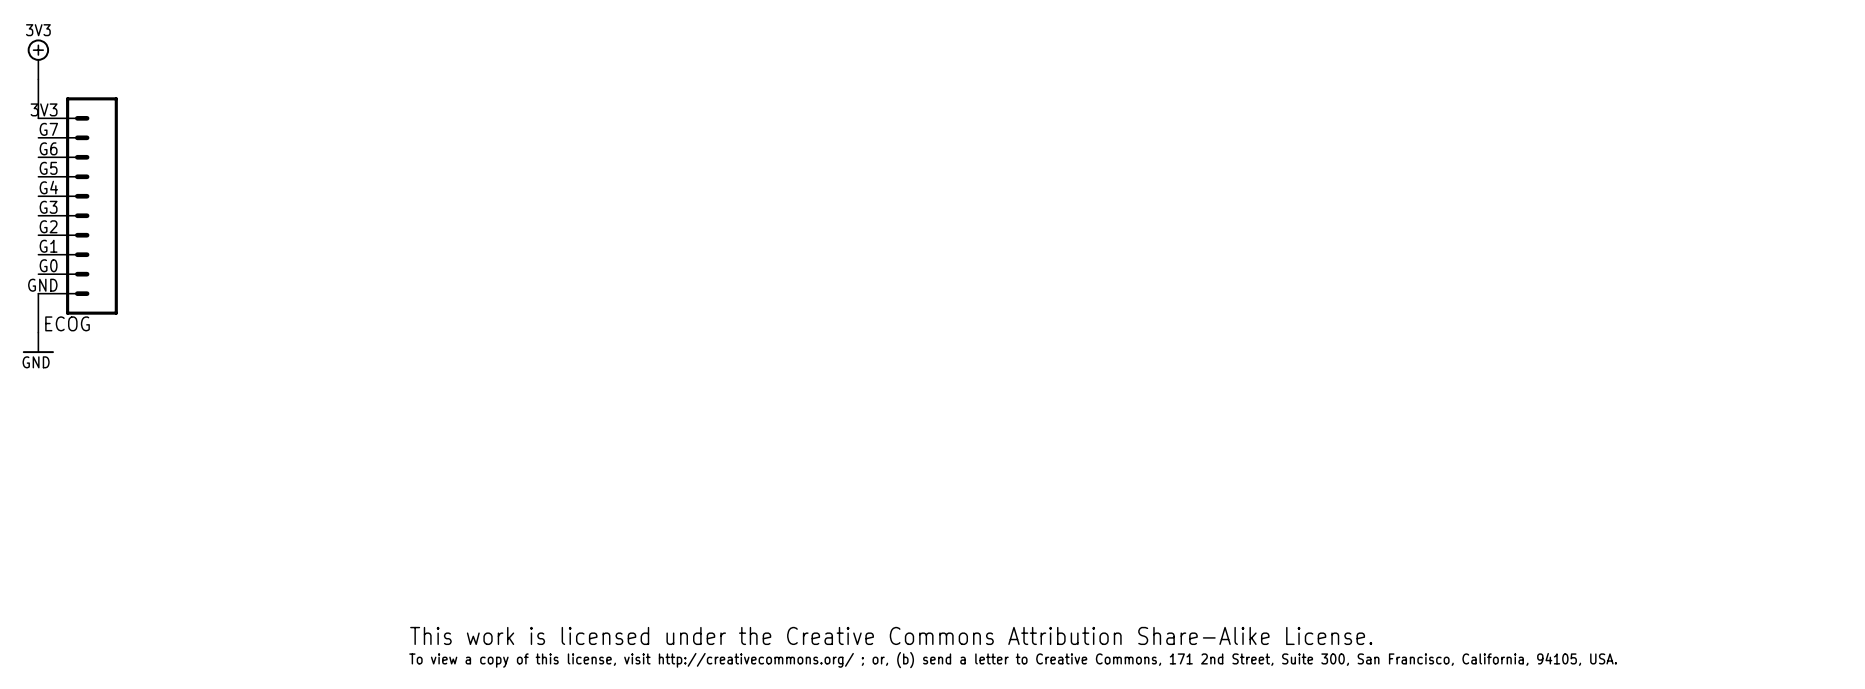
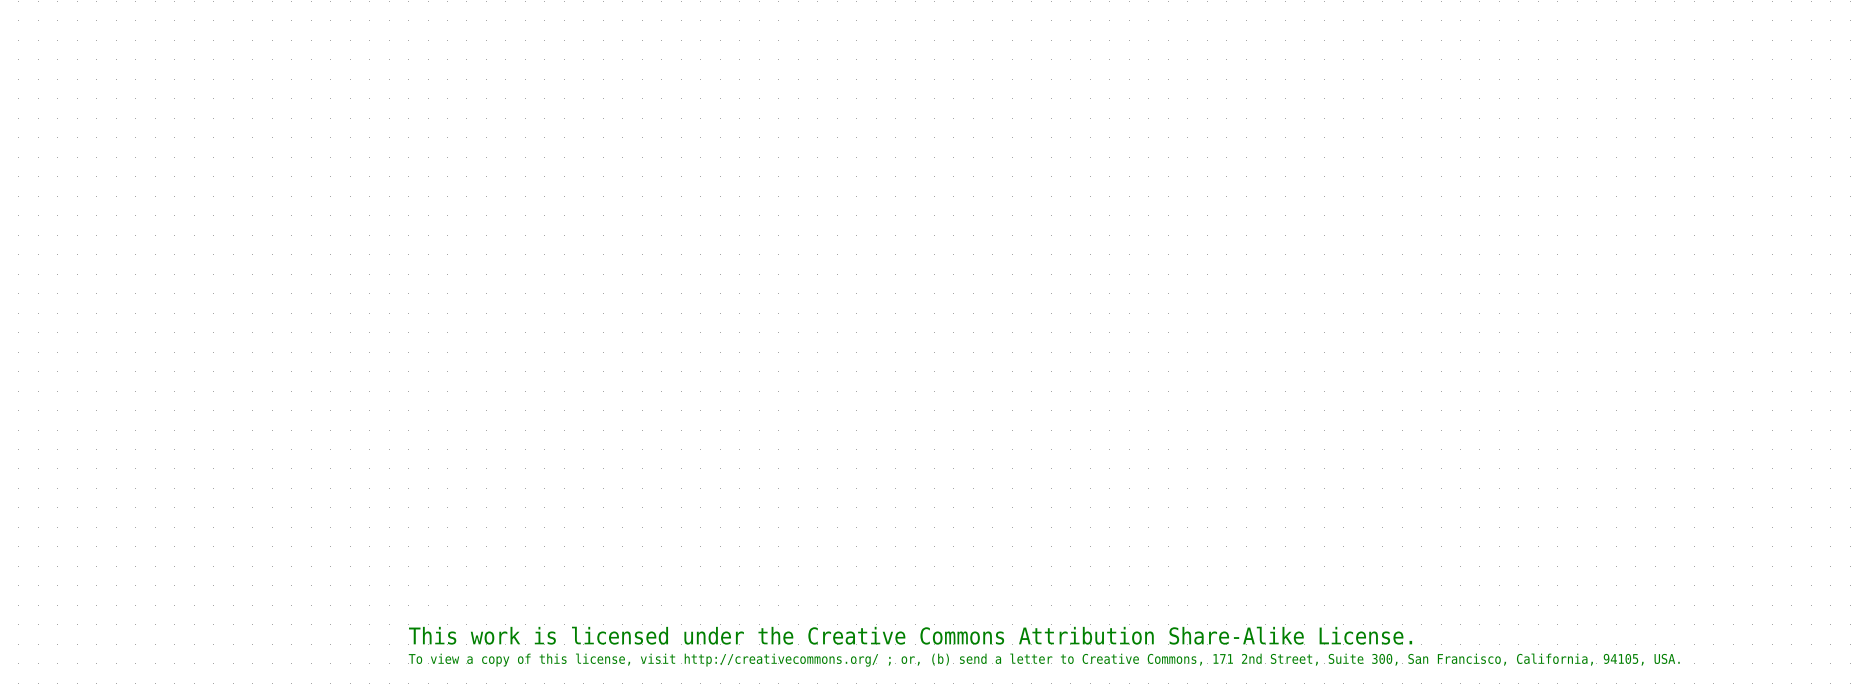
power symbol: 3V3 (38, 59) -> none
wire: (38, 79) (38, 118) -> none
ECOG: (78, 206) -> none
wire: (38, 293) (38, 332) -> none
power symbol: GND (38, 342) -> none

